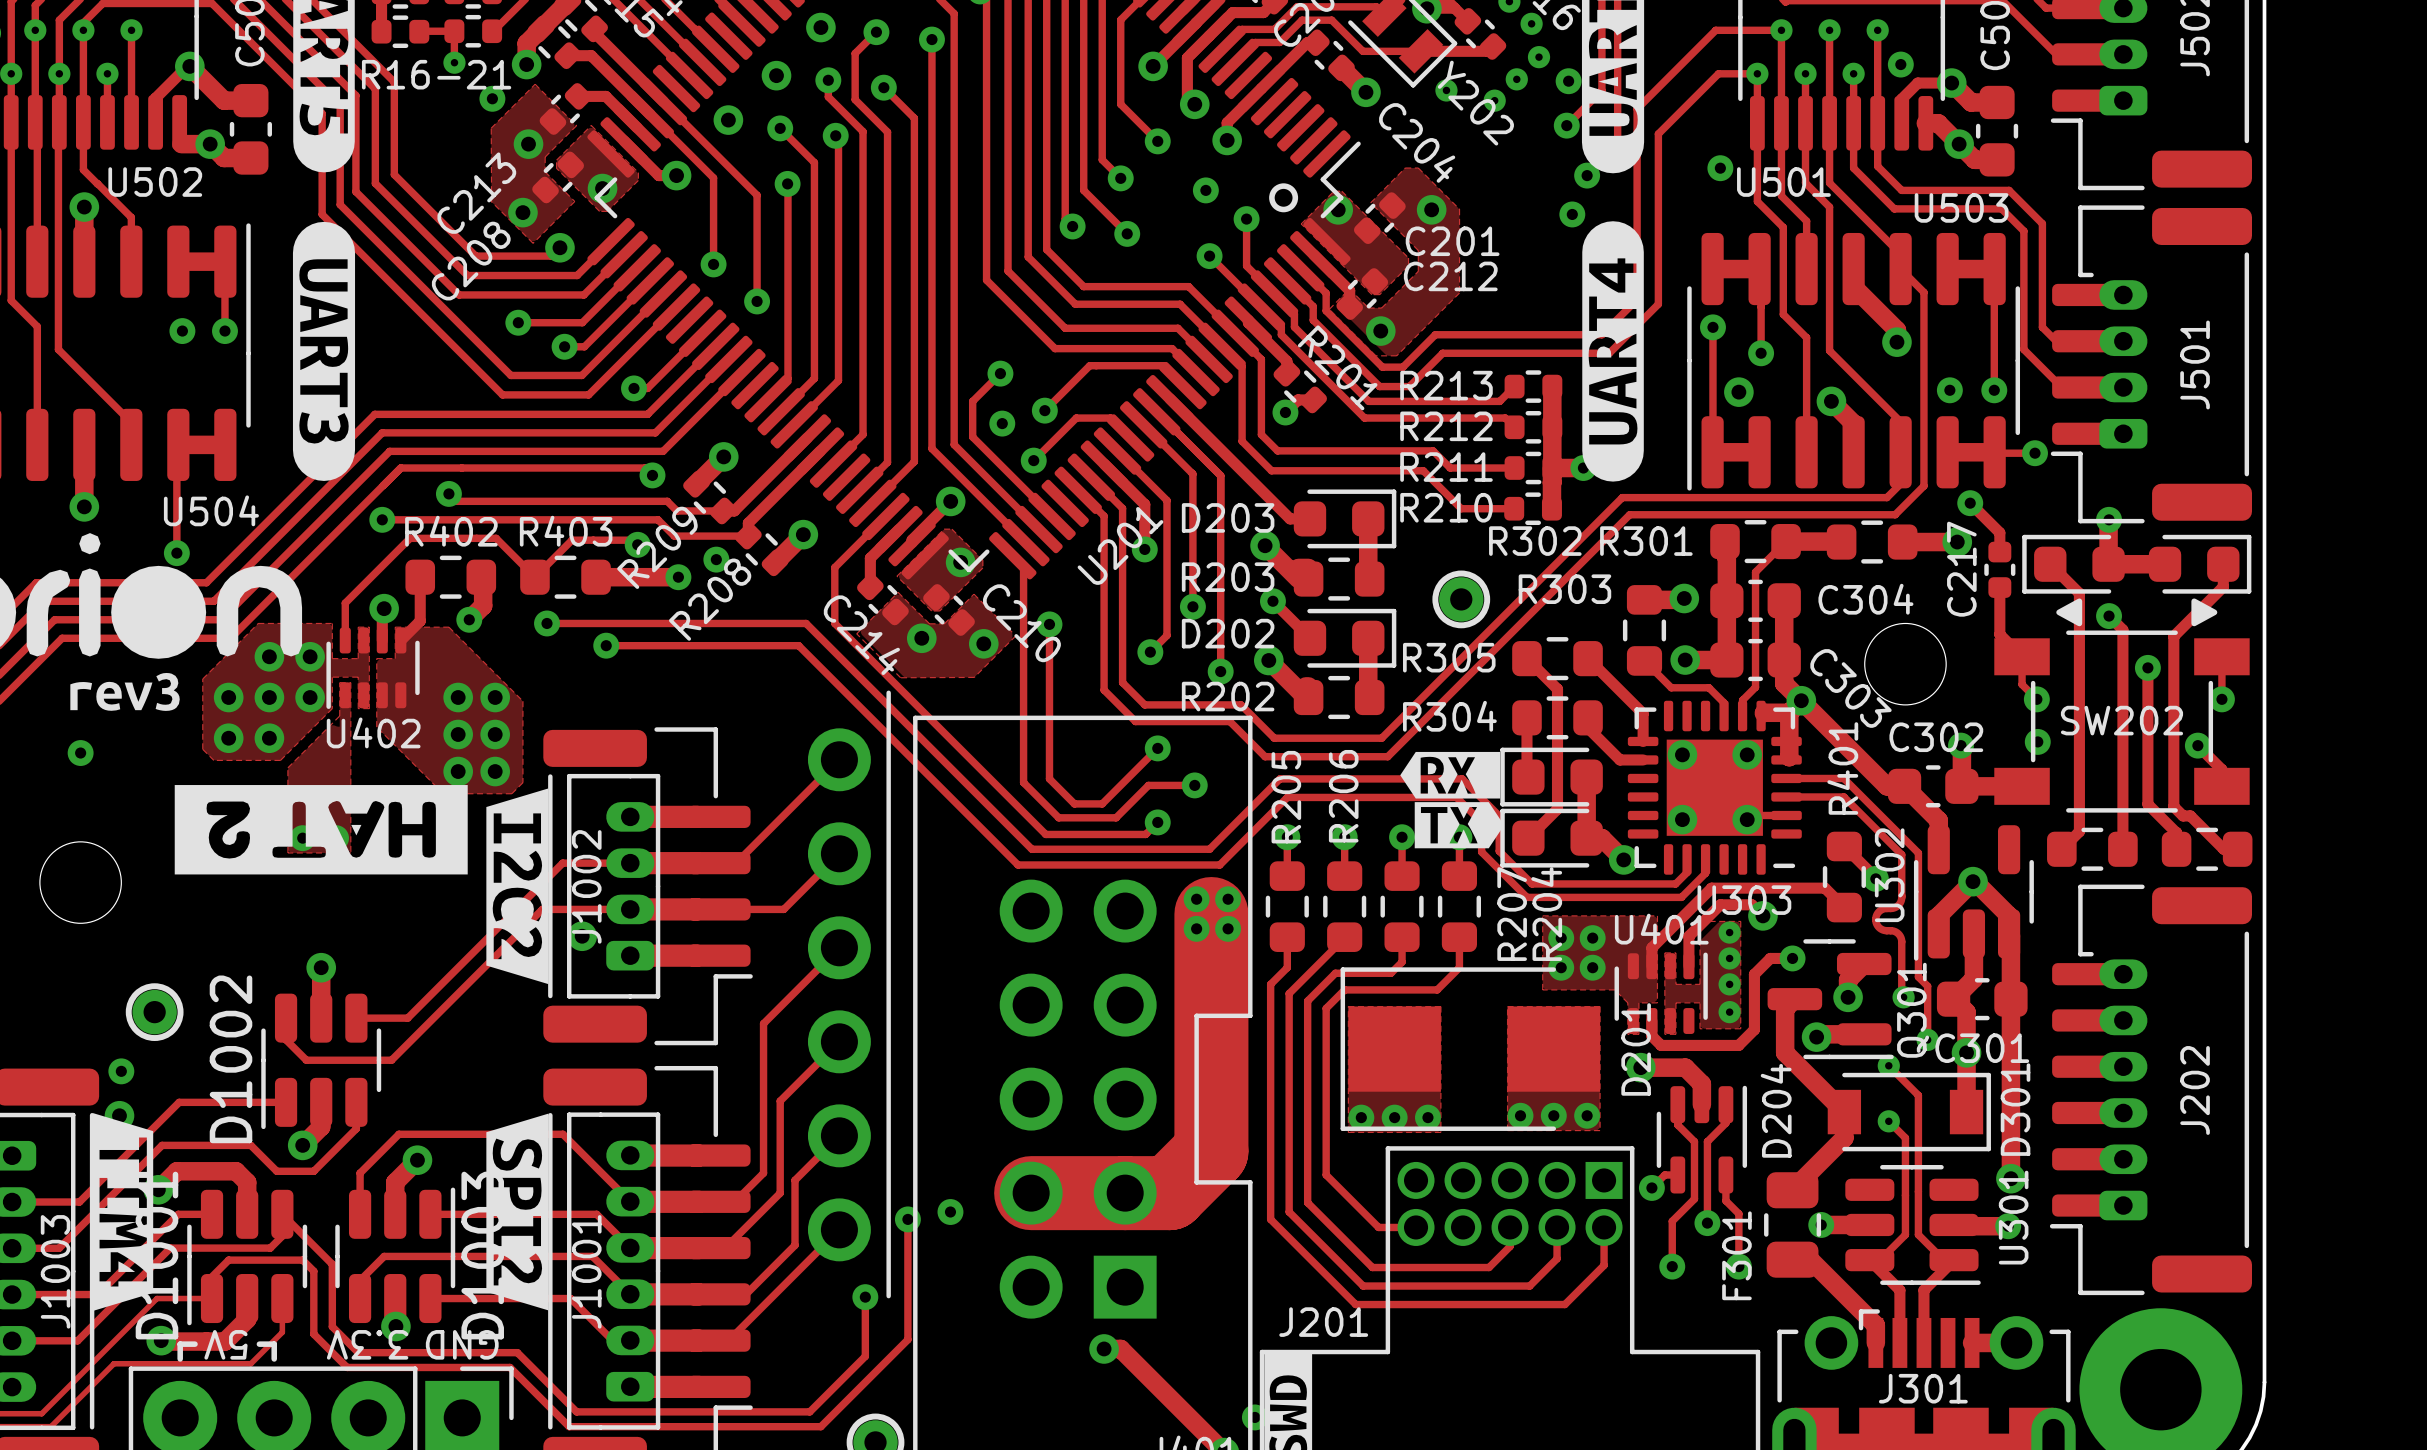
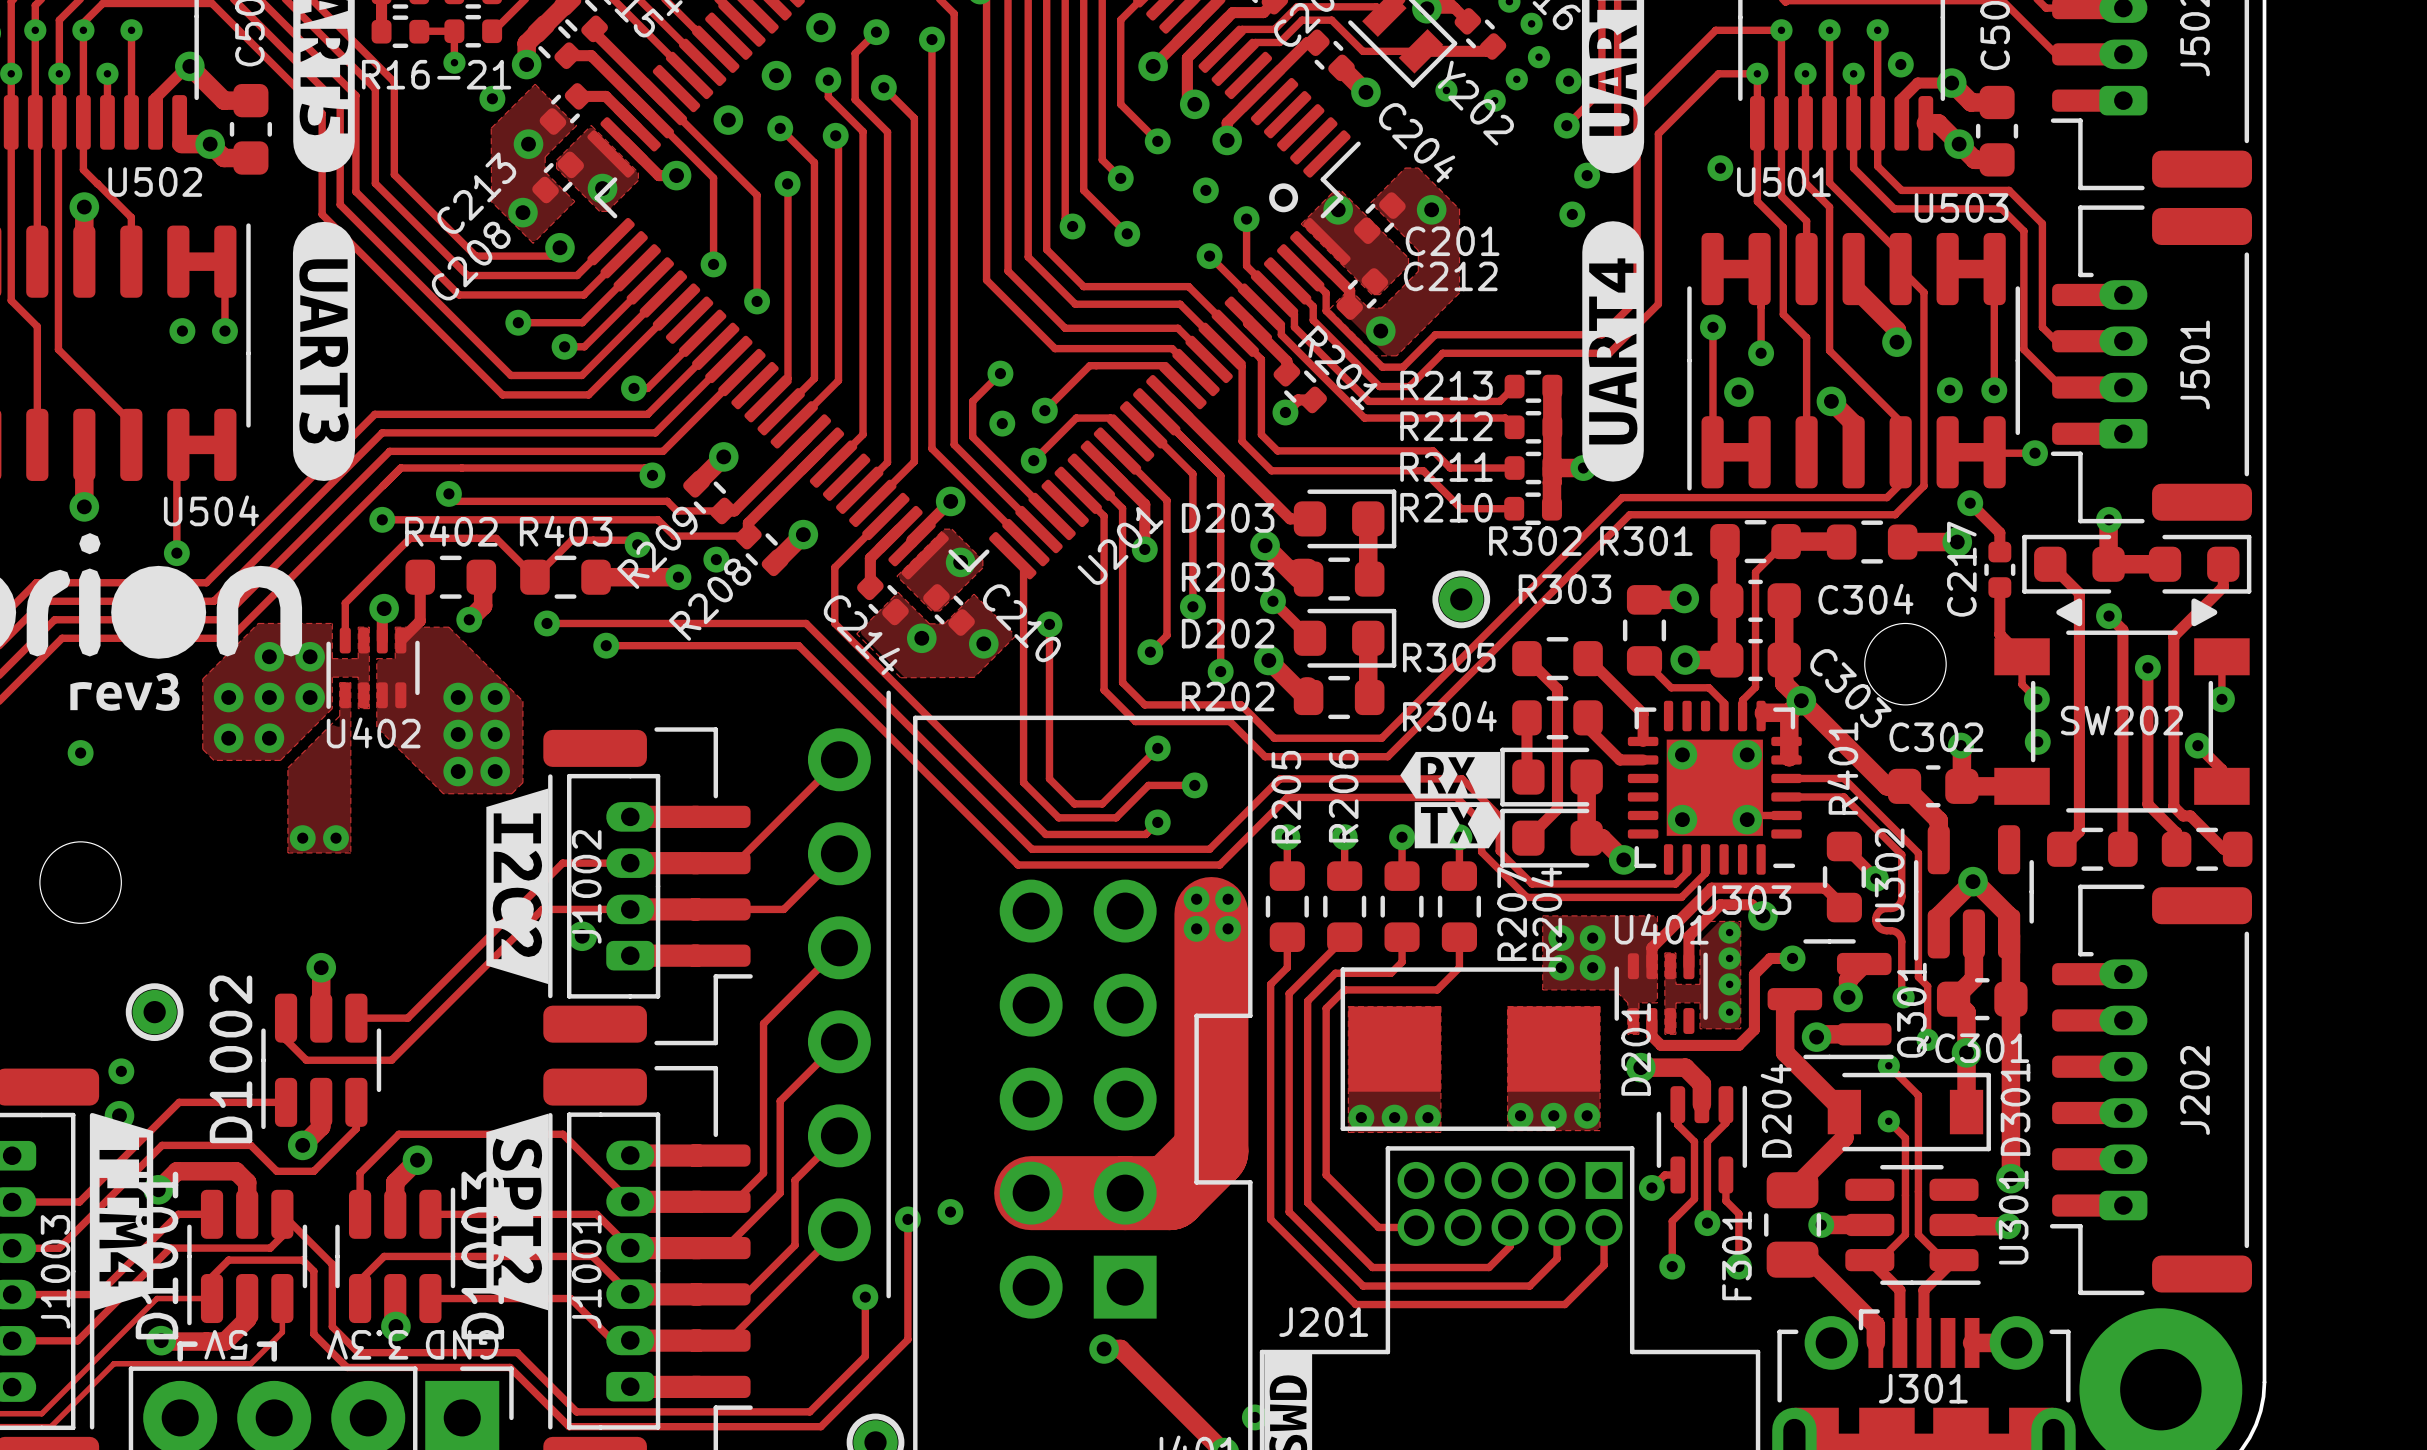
drawing: [174, 785, 468, 875] -> none

